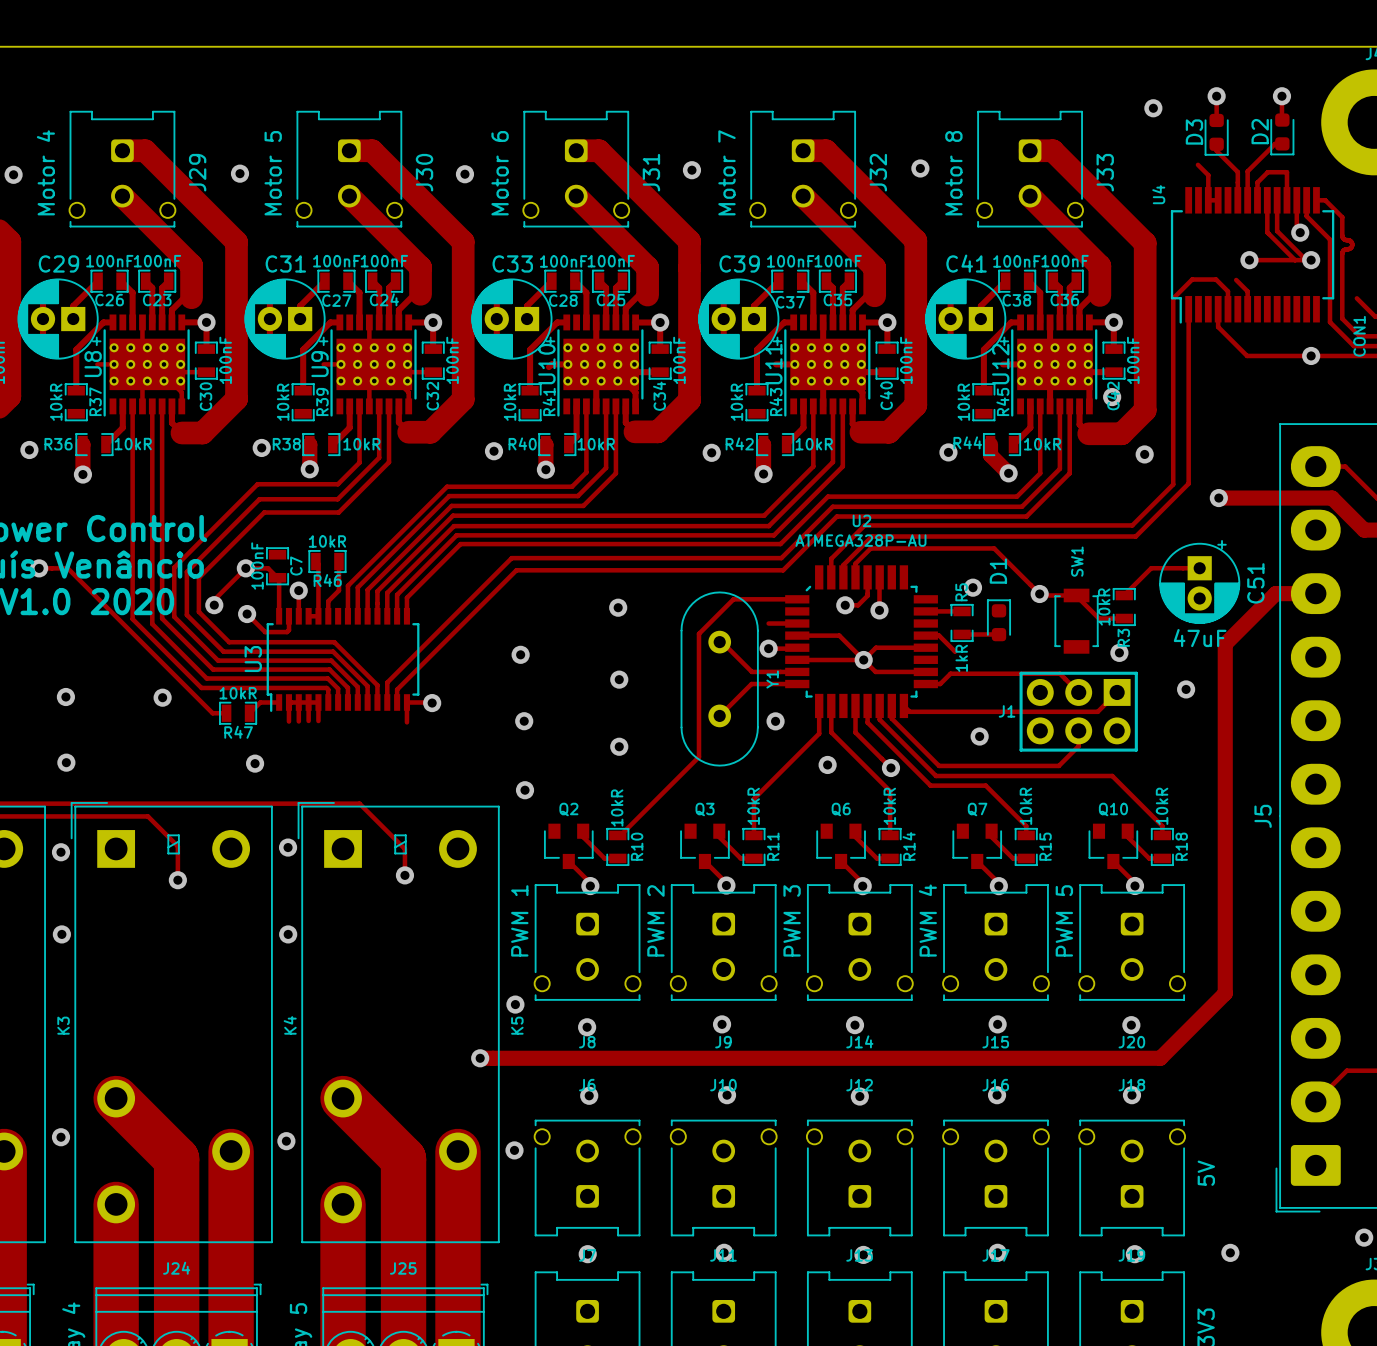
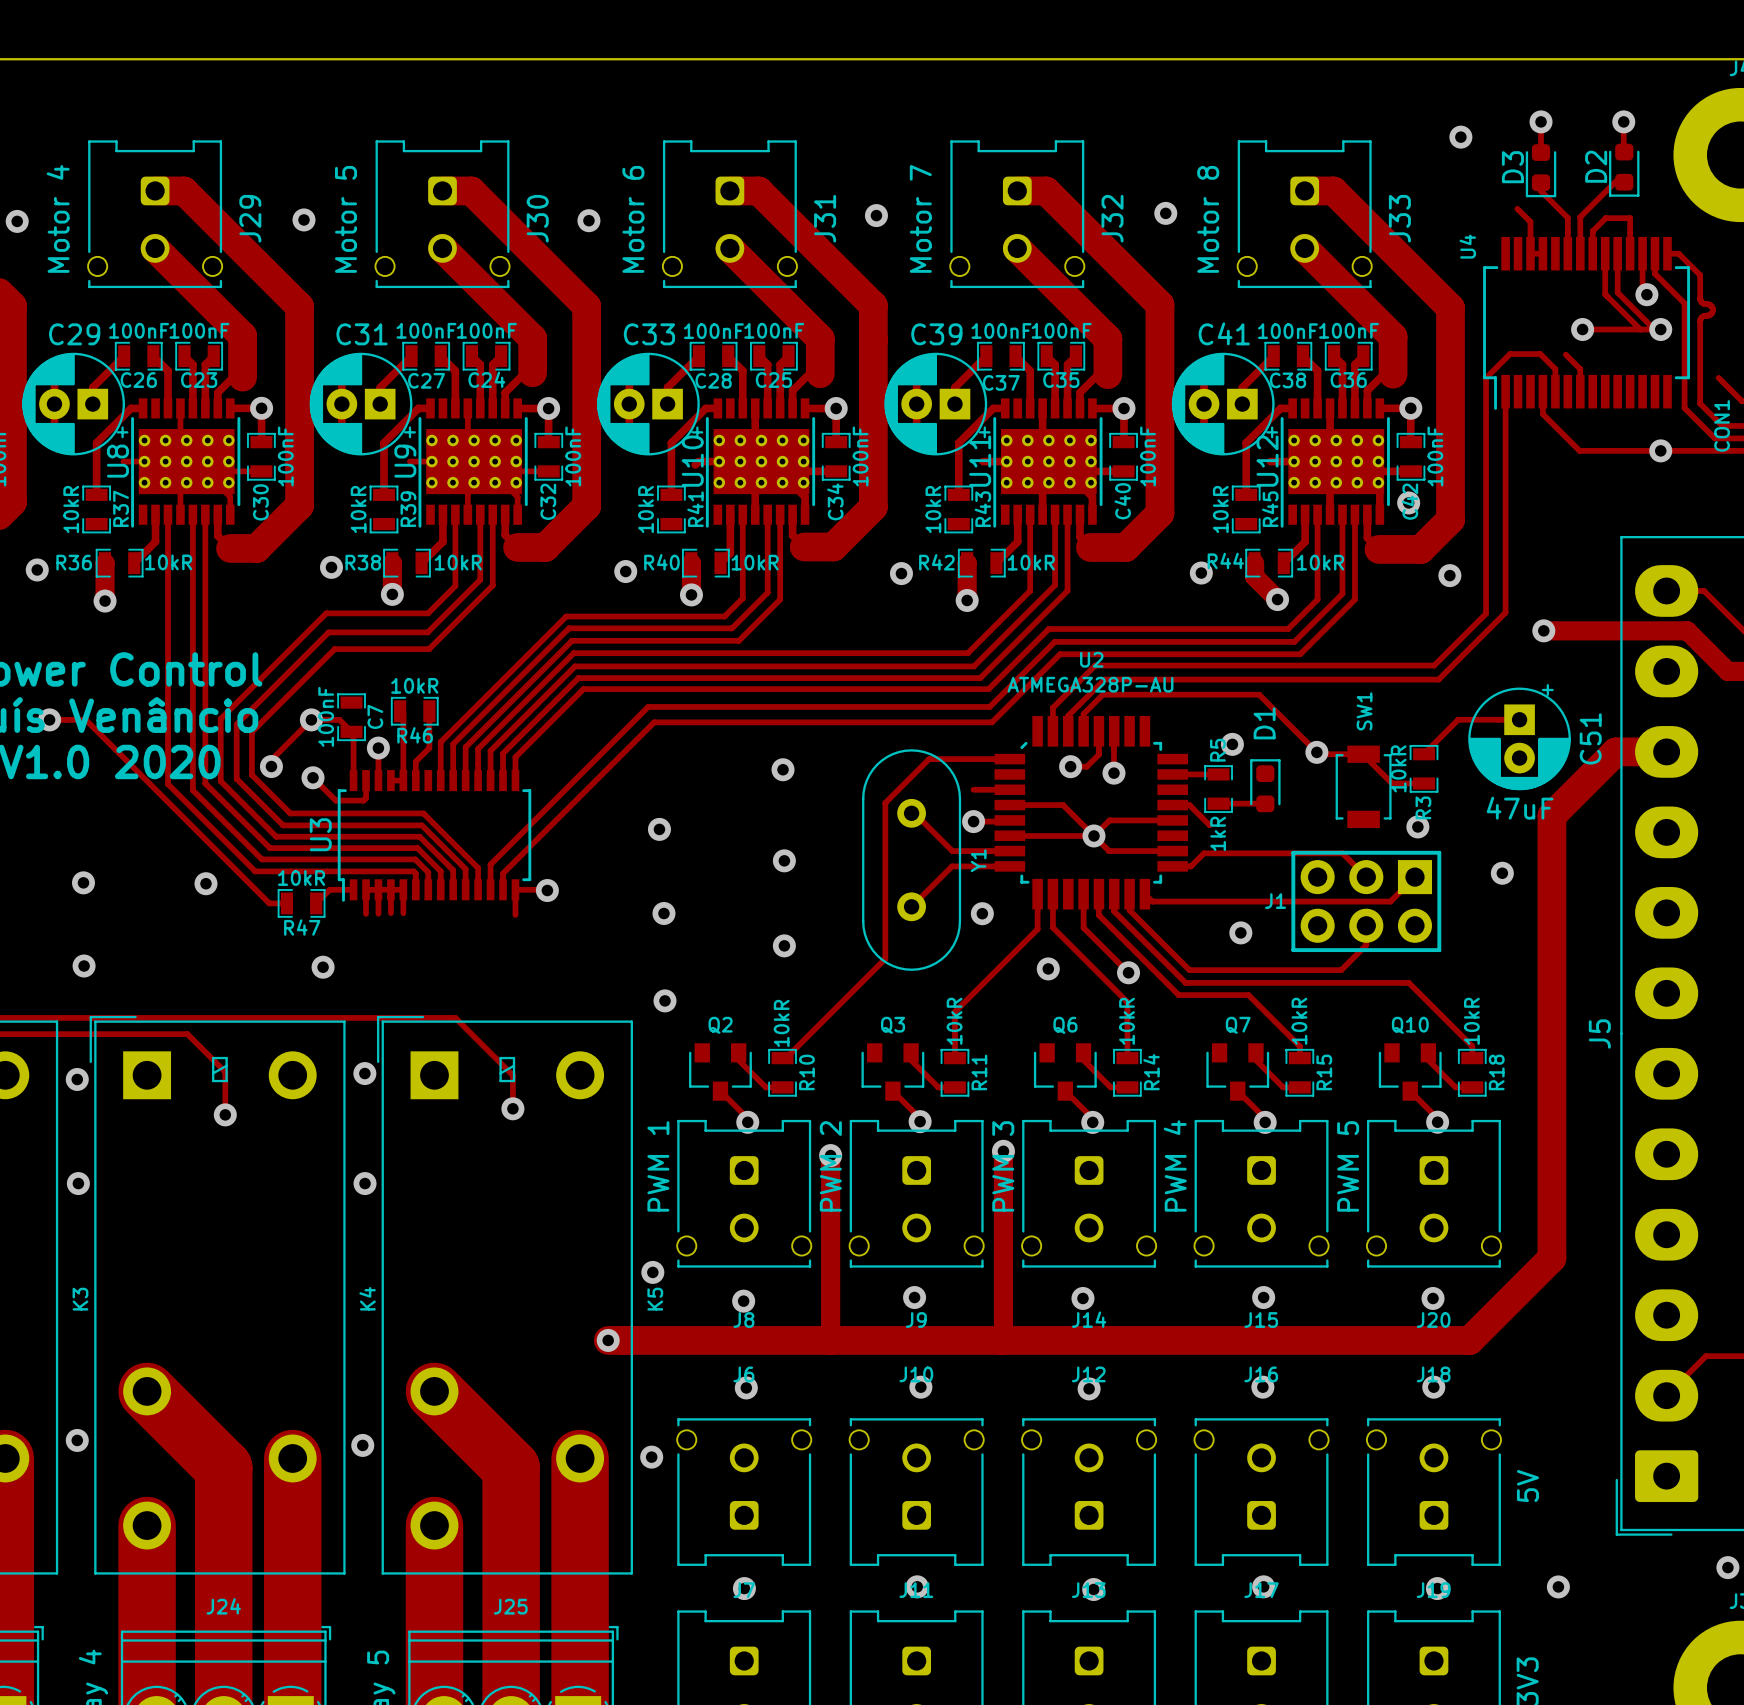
track width: thin (1315, 593) (1275, 593) (1225, 644) (1225, 993) (1160, 1058) (480, 1058) -> thick (1666, 751) (1615, 751) (1551, 815) (1551, 1258) (1469, 1340) (608, 1340)
track: none -> (1003, 1151) (1003, 1338) (1001, 1340)
via: none -> (1003, 1151)
track: none -> (830, 1155) (831, 1340)
via: none -> (830, 1155)

